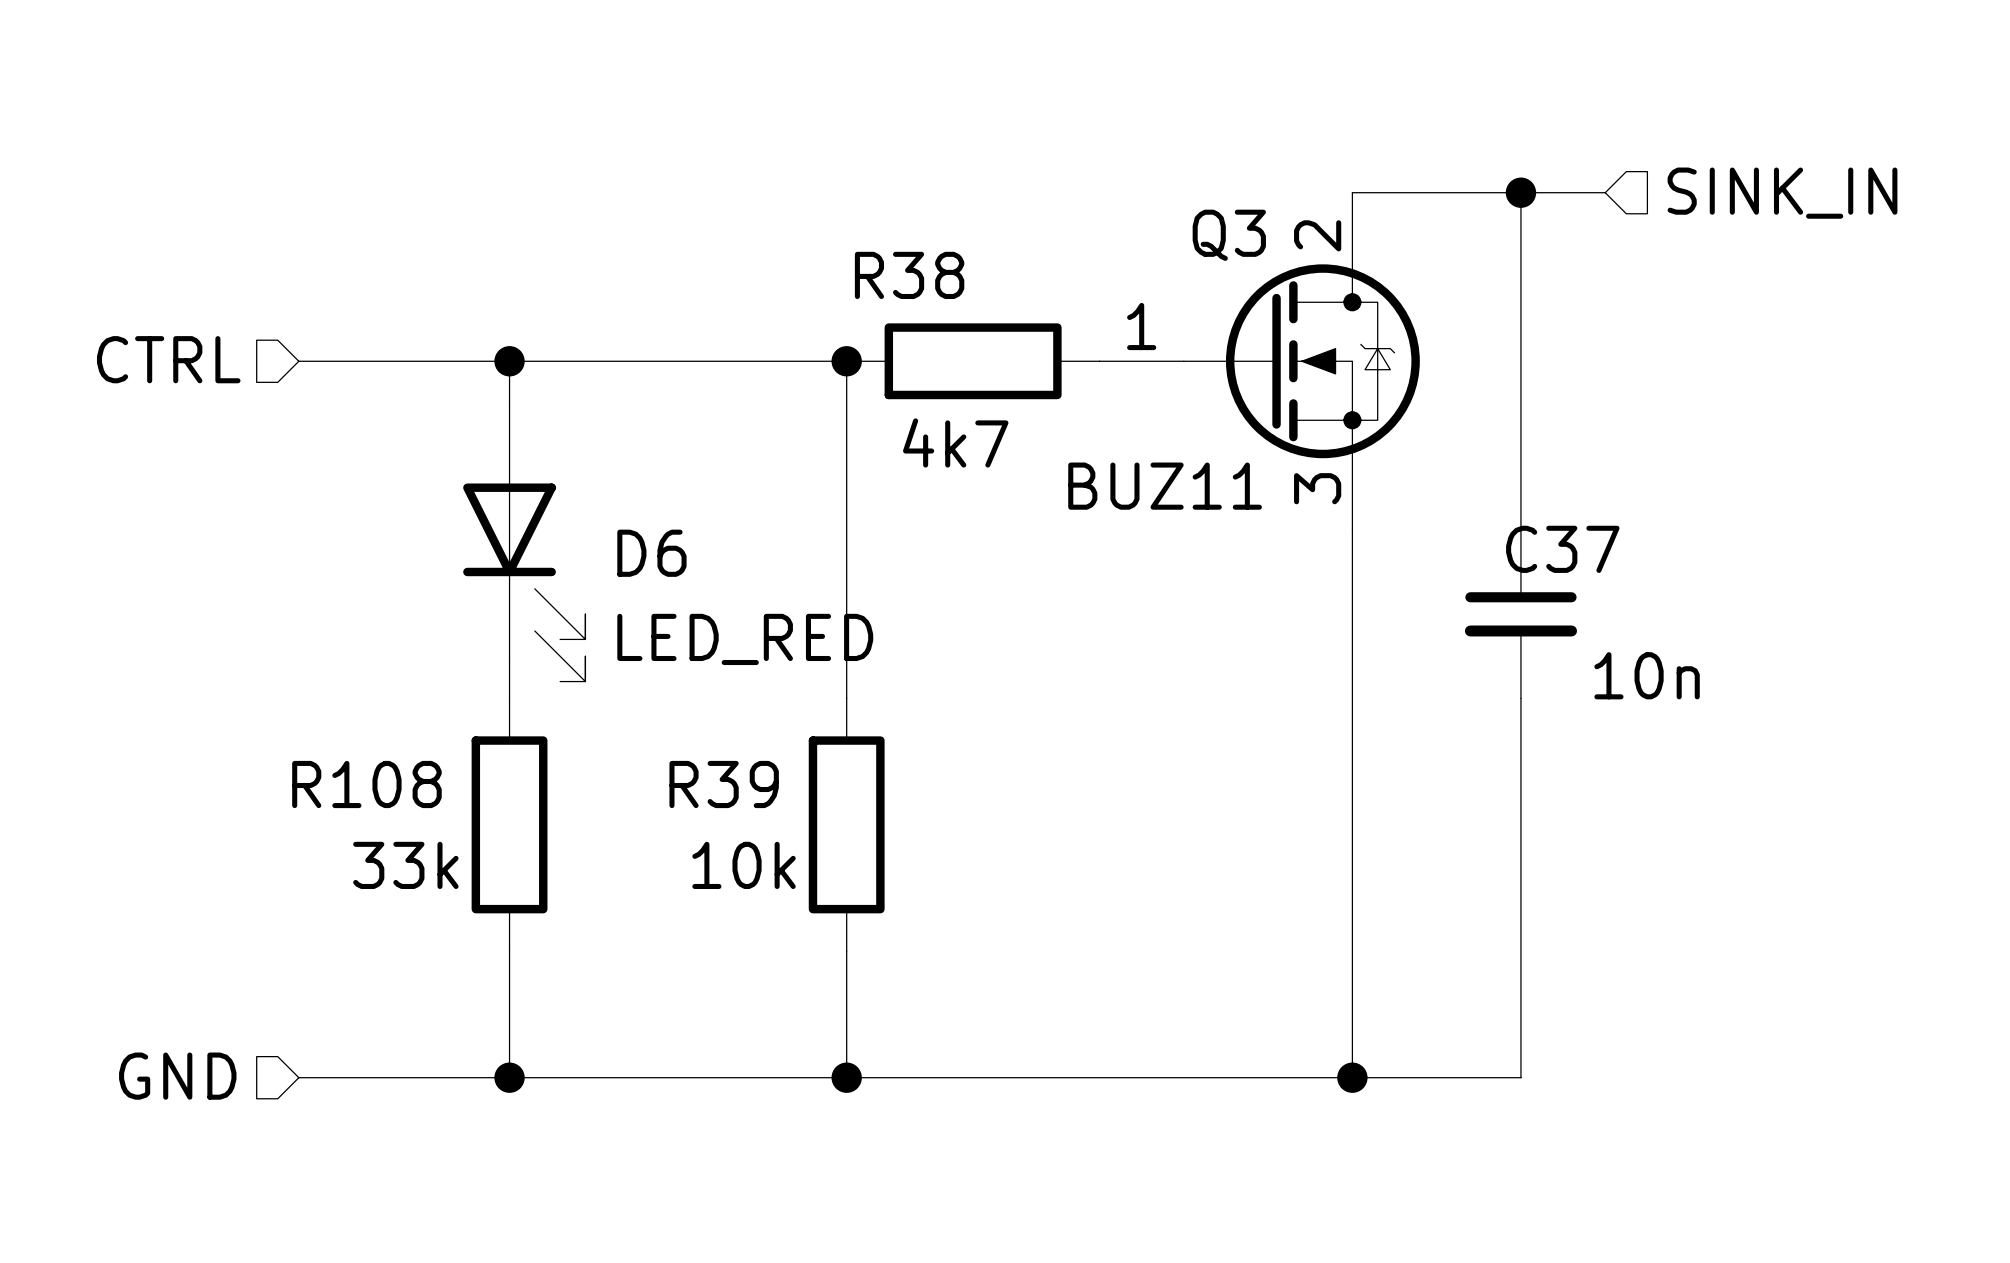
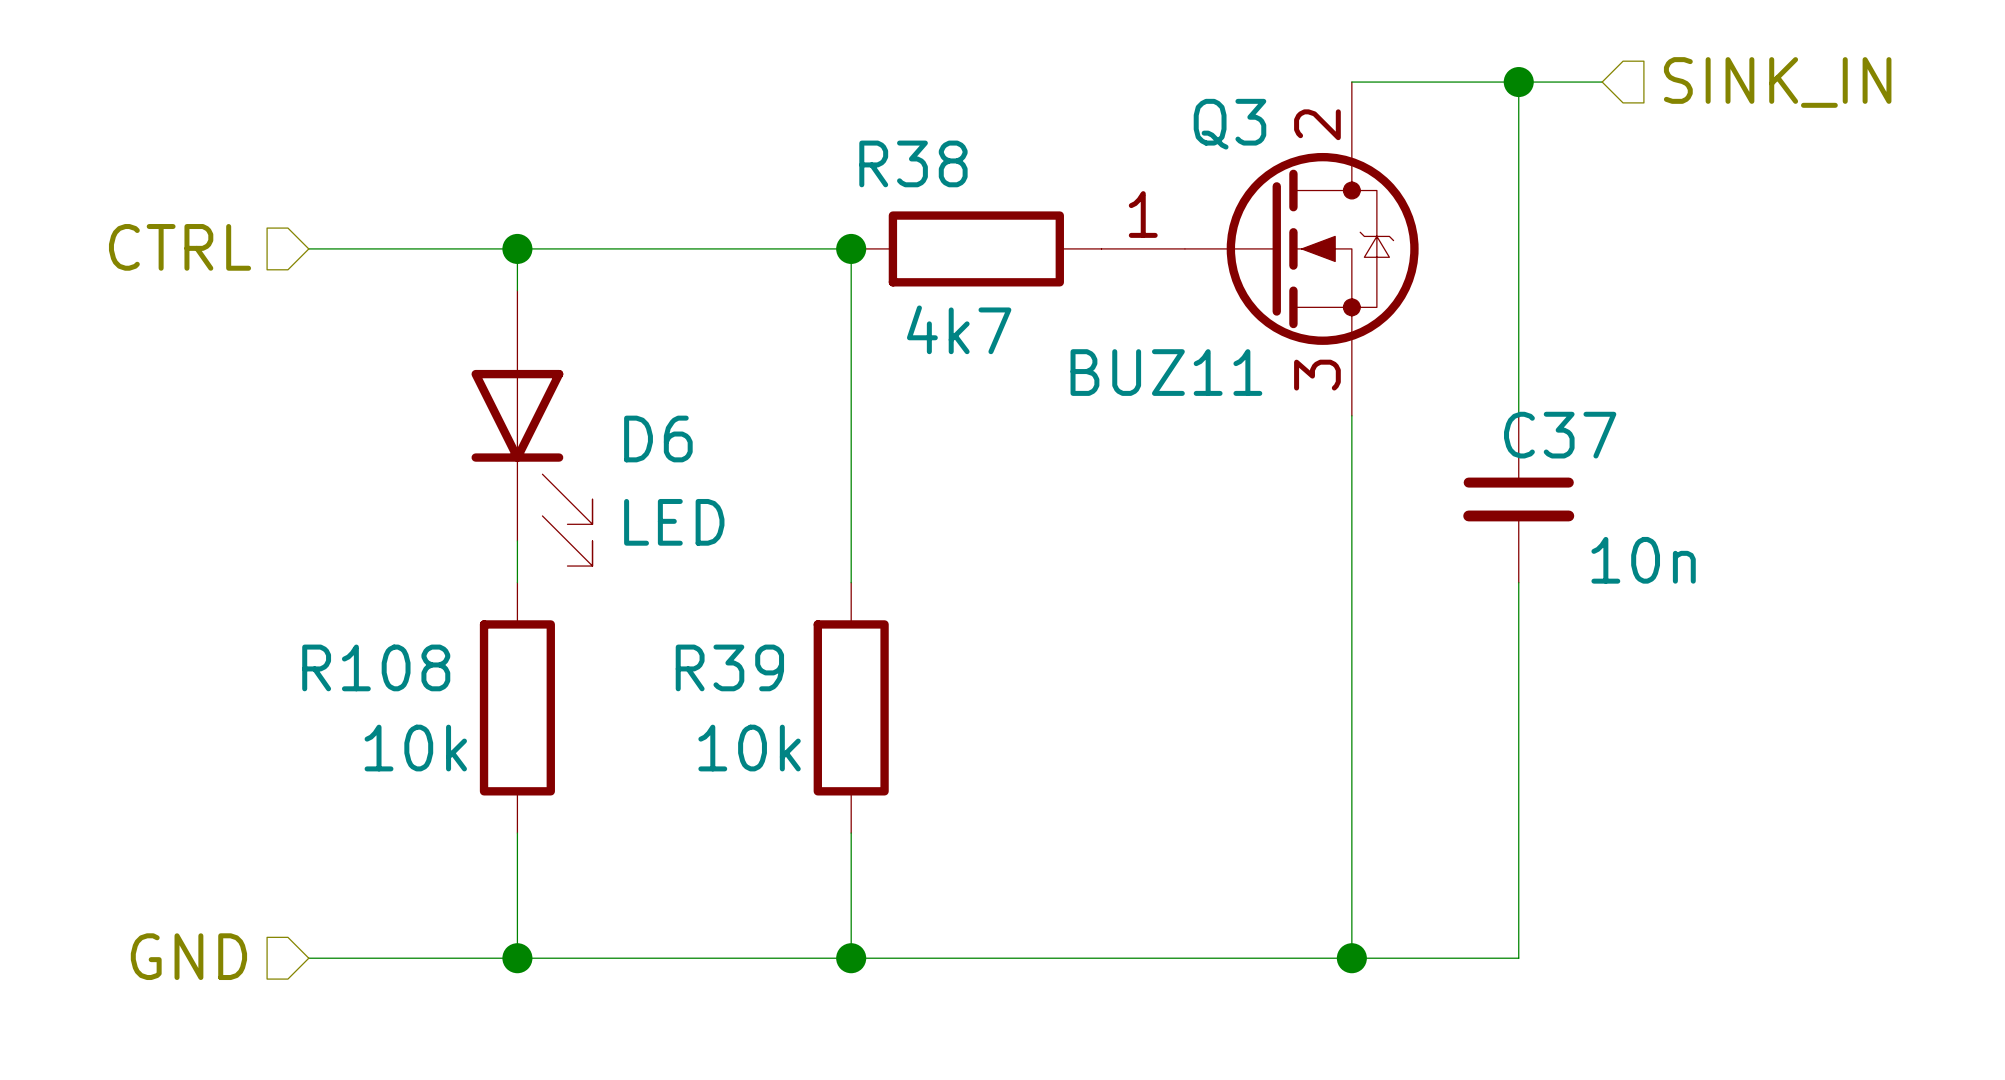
D6 value: LED_RED (745, 639) -> LED (674, 522)
R108 value: 33k (405, 865) -> 10k (415, 748)

